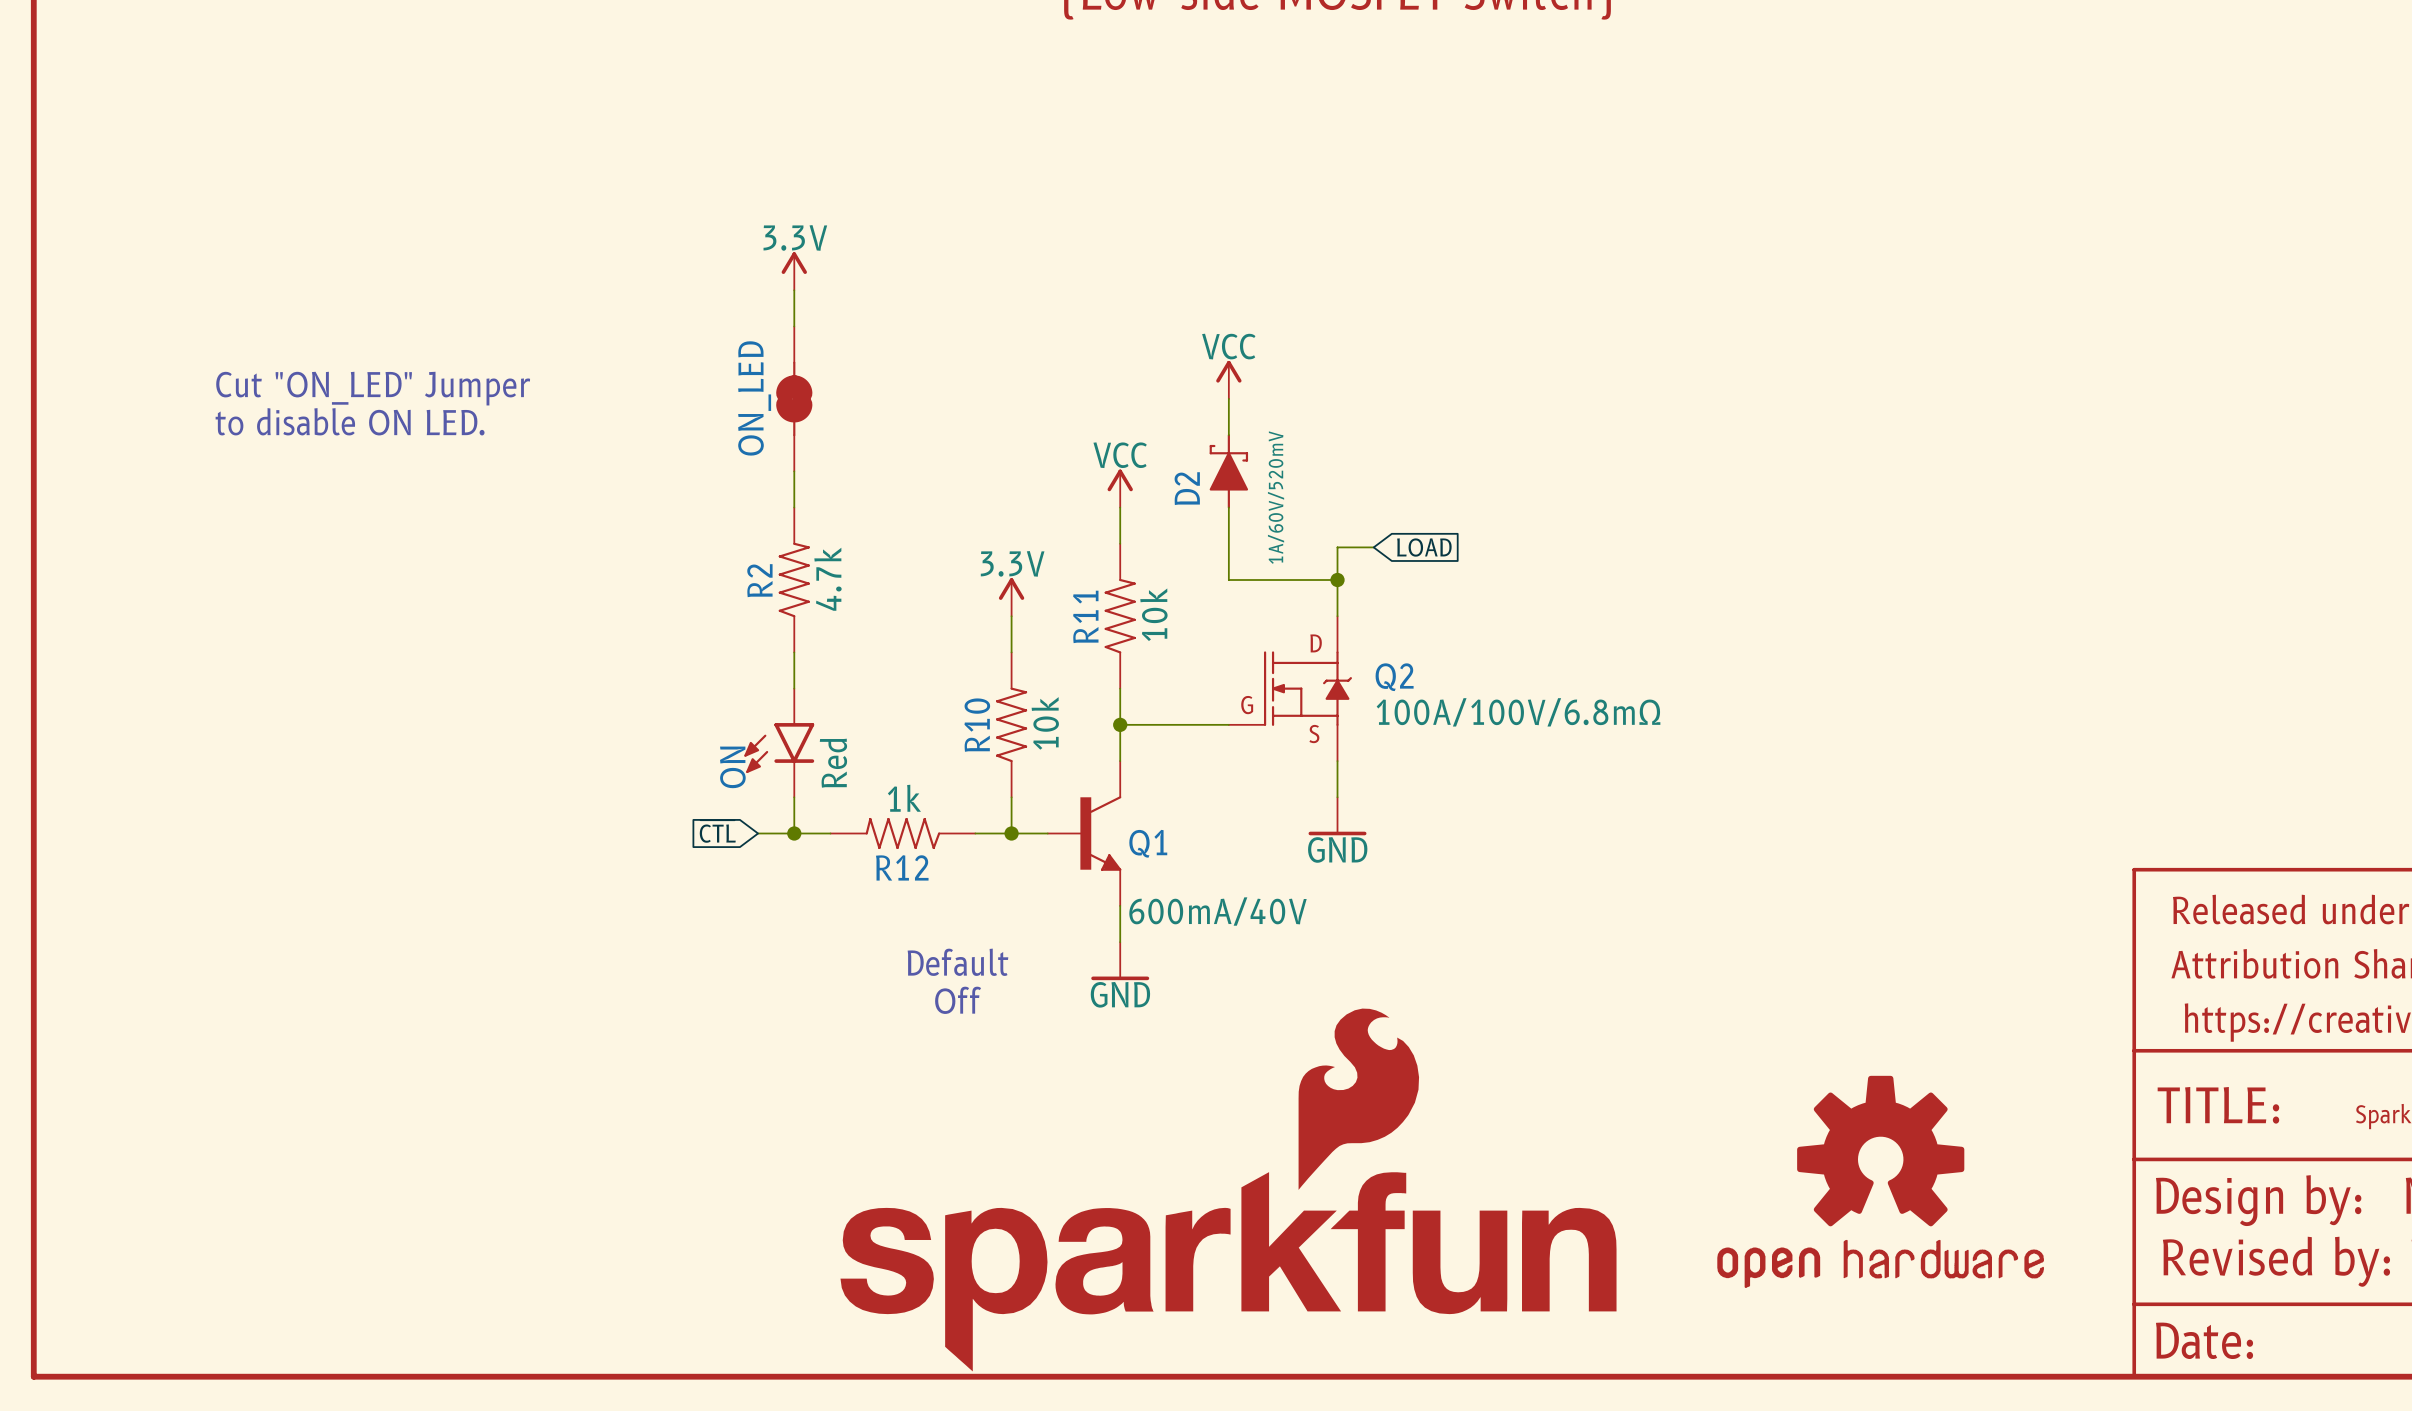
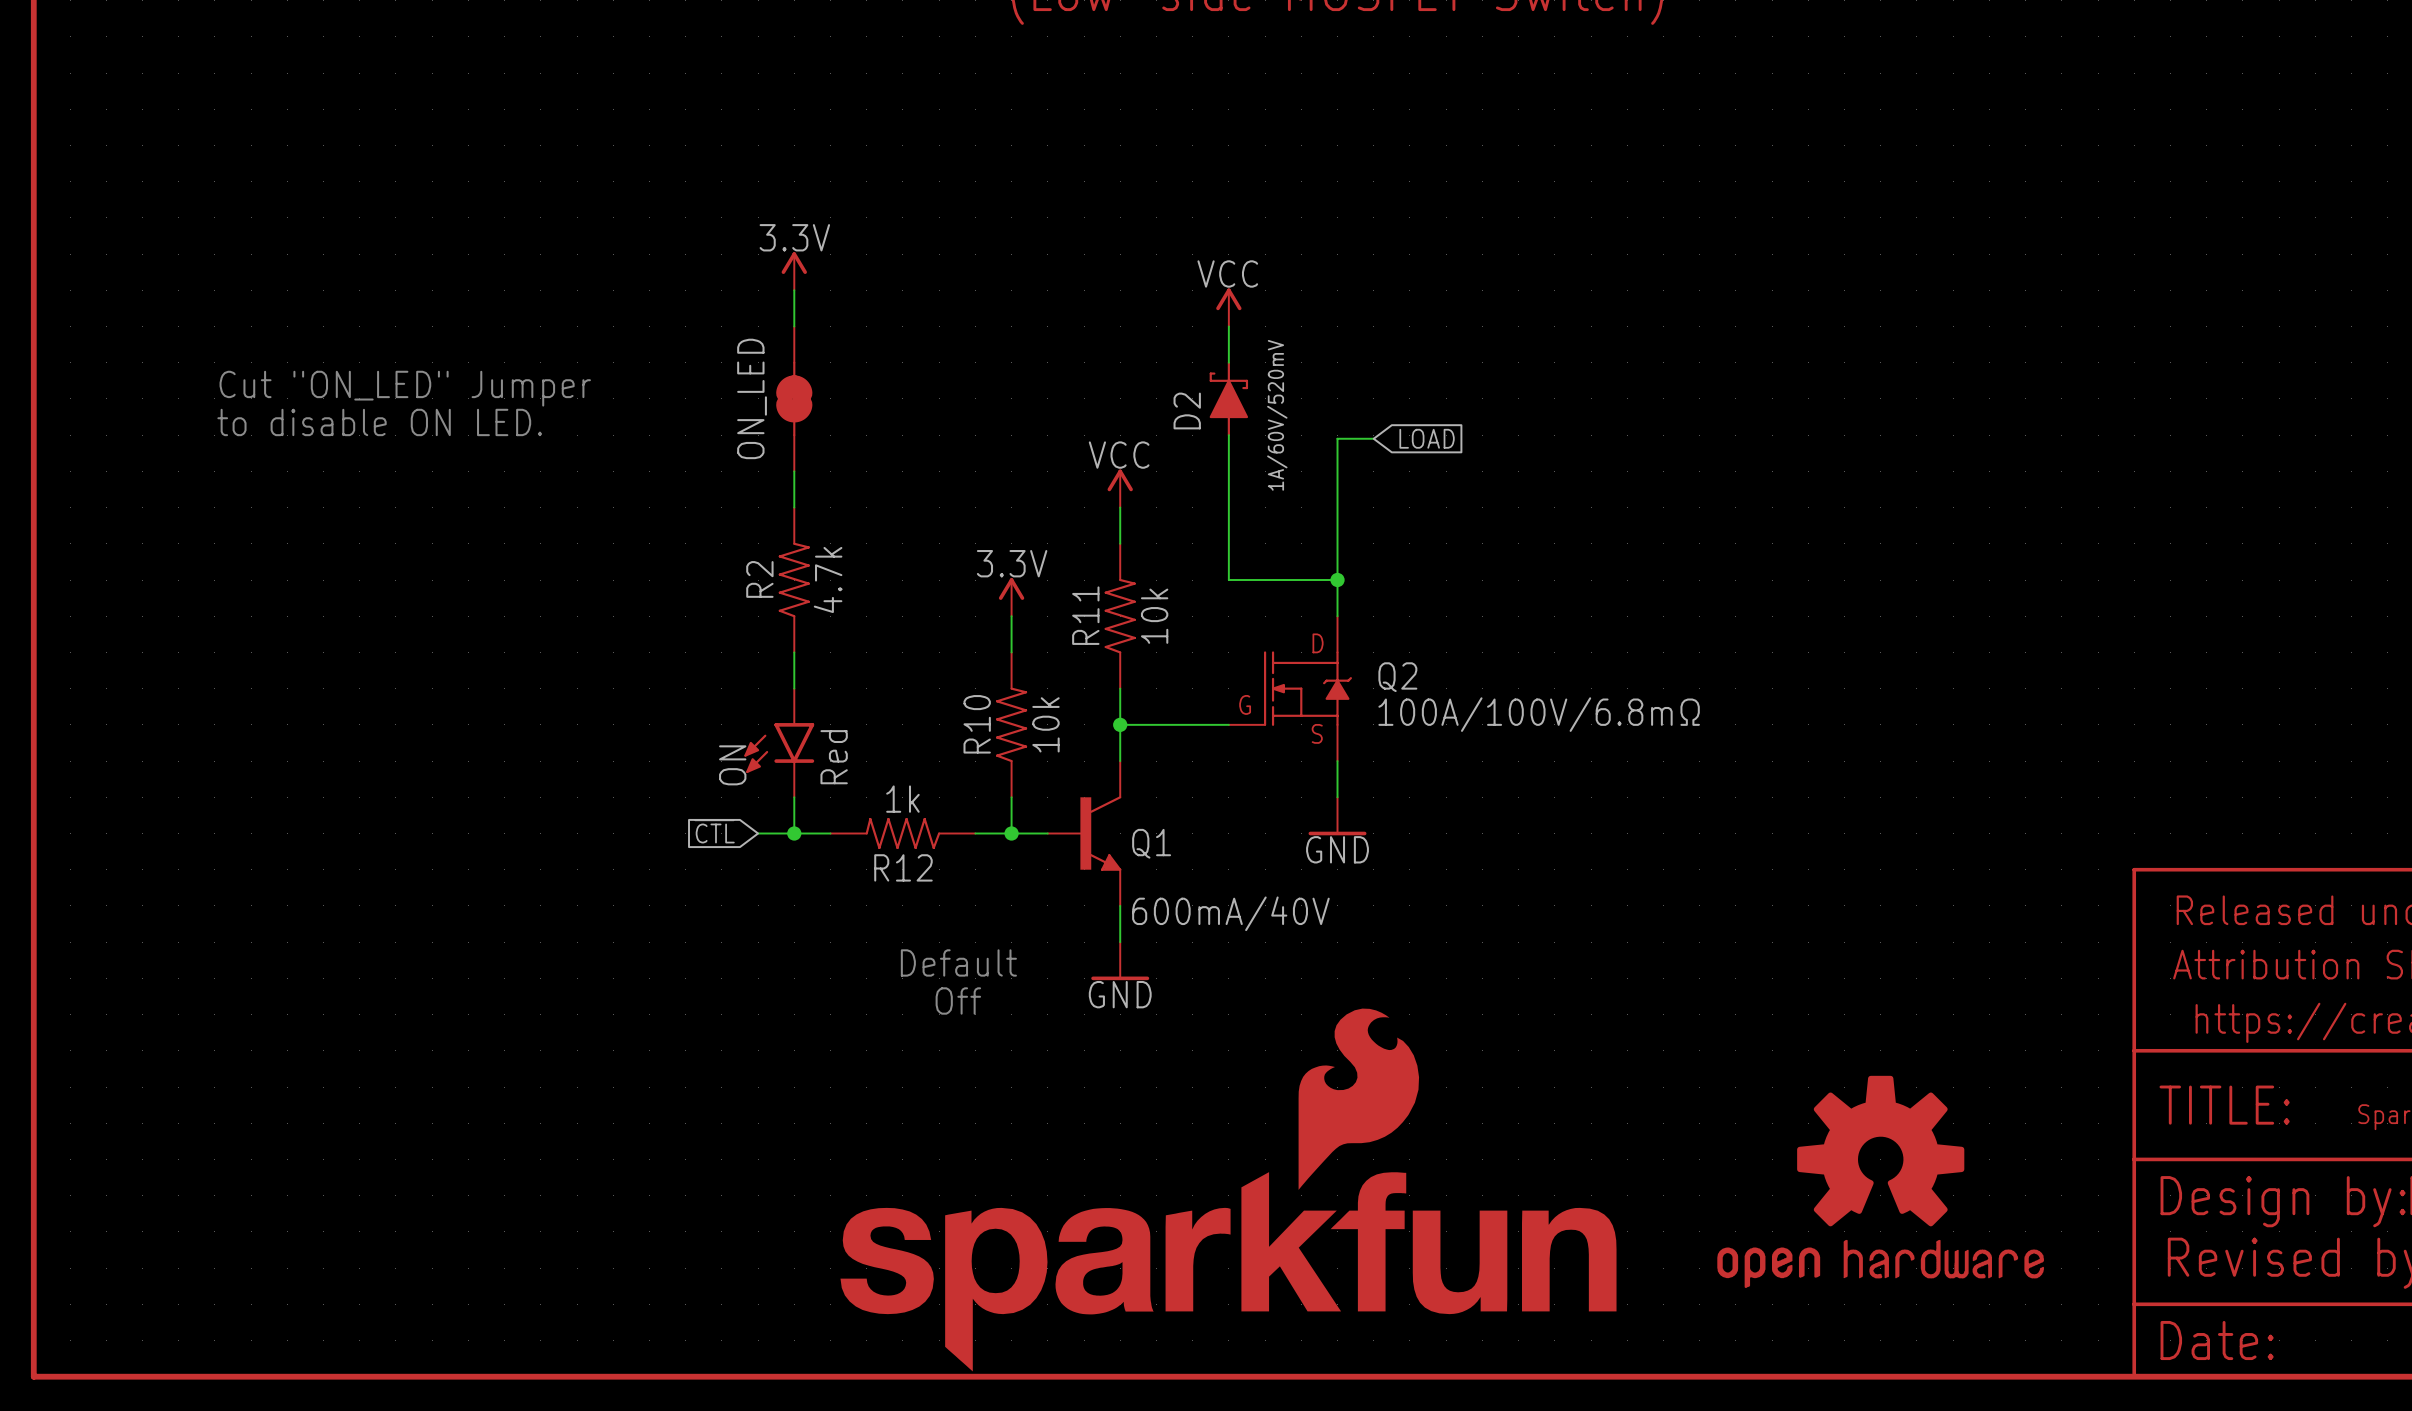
wire: none -> (1228, 326) (1228, 362)
power symbol position: VCC (1228, 379) -> VCC (1228, 307)
D2 position: (1228, 471) -> (1228, 398)
wire: (1337, 547) (1373, 547) -> (1337, 547) (1337, 438) (1373, 438)
global label position: LOAD (1424, 547) -> LOAD (1427, 438)

